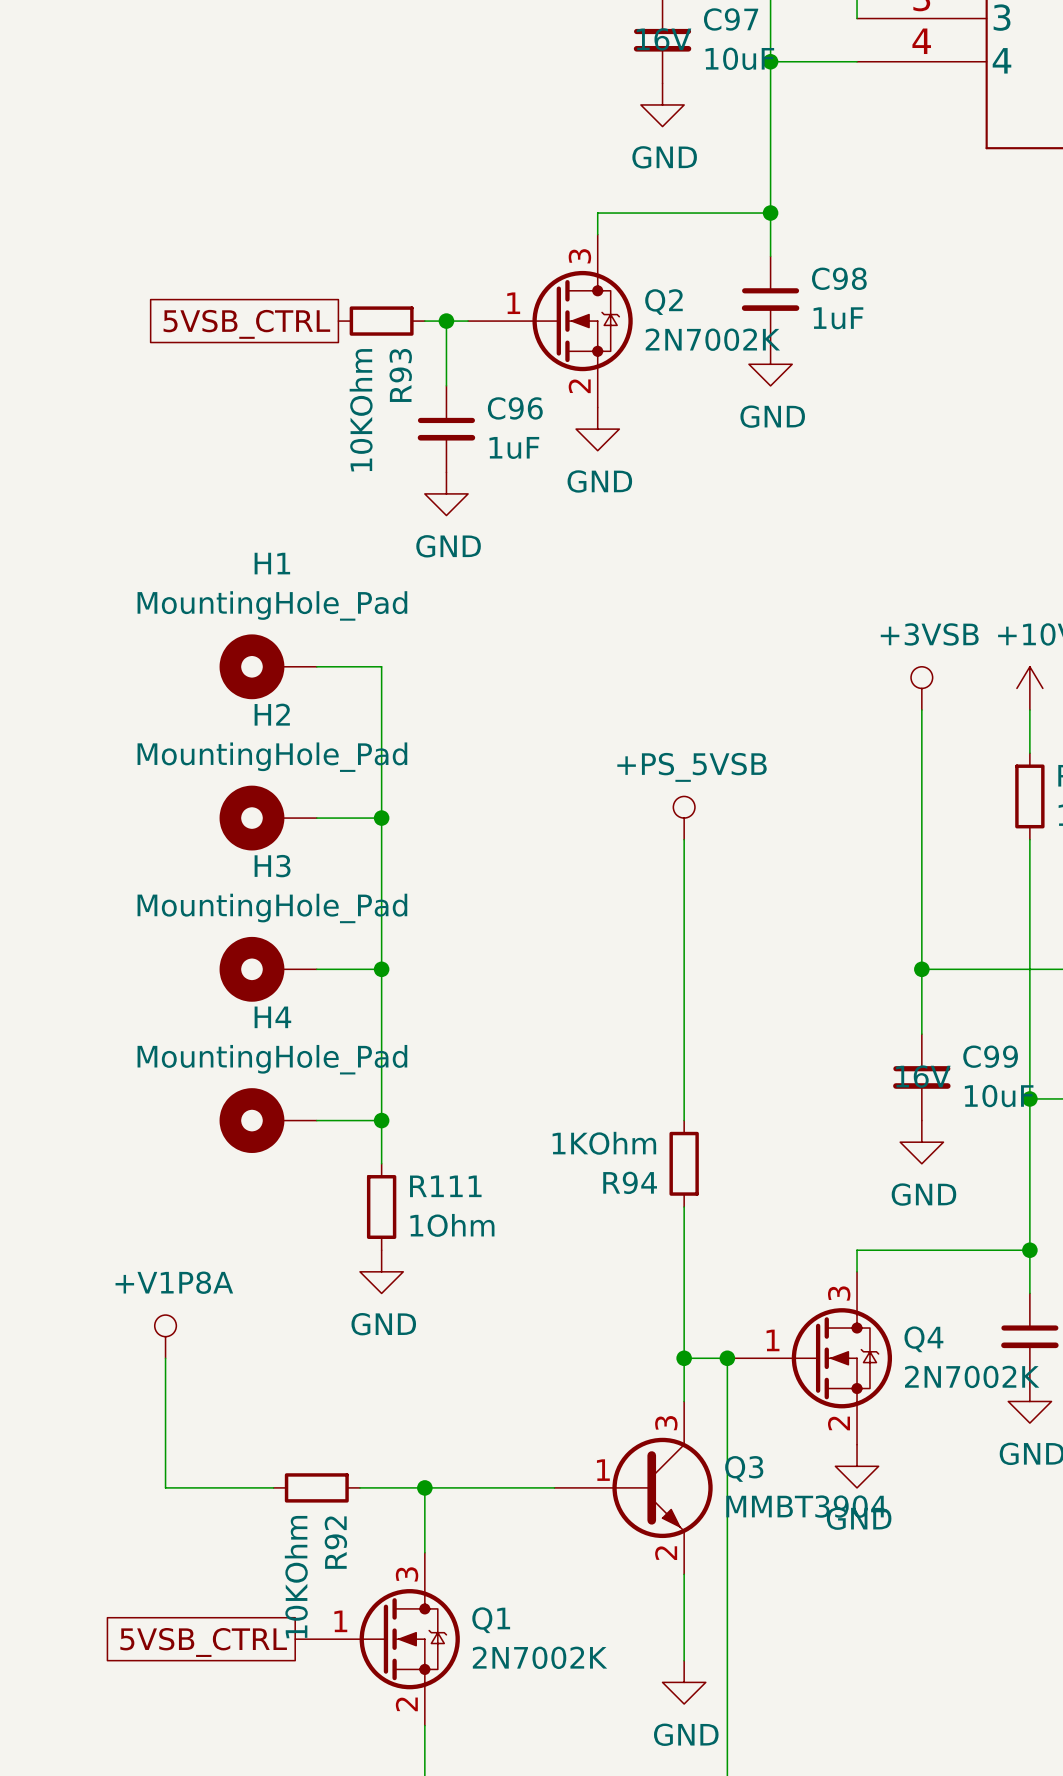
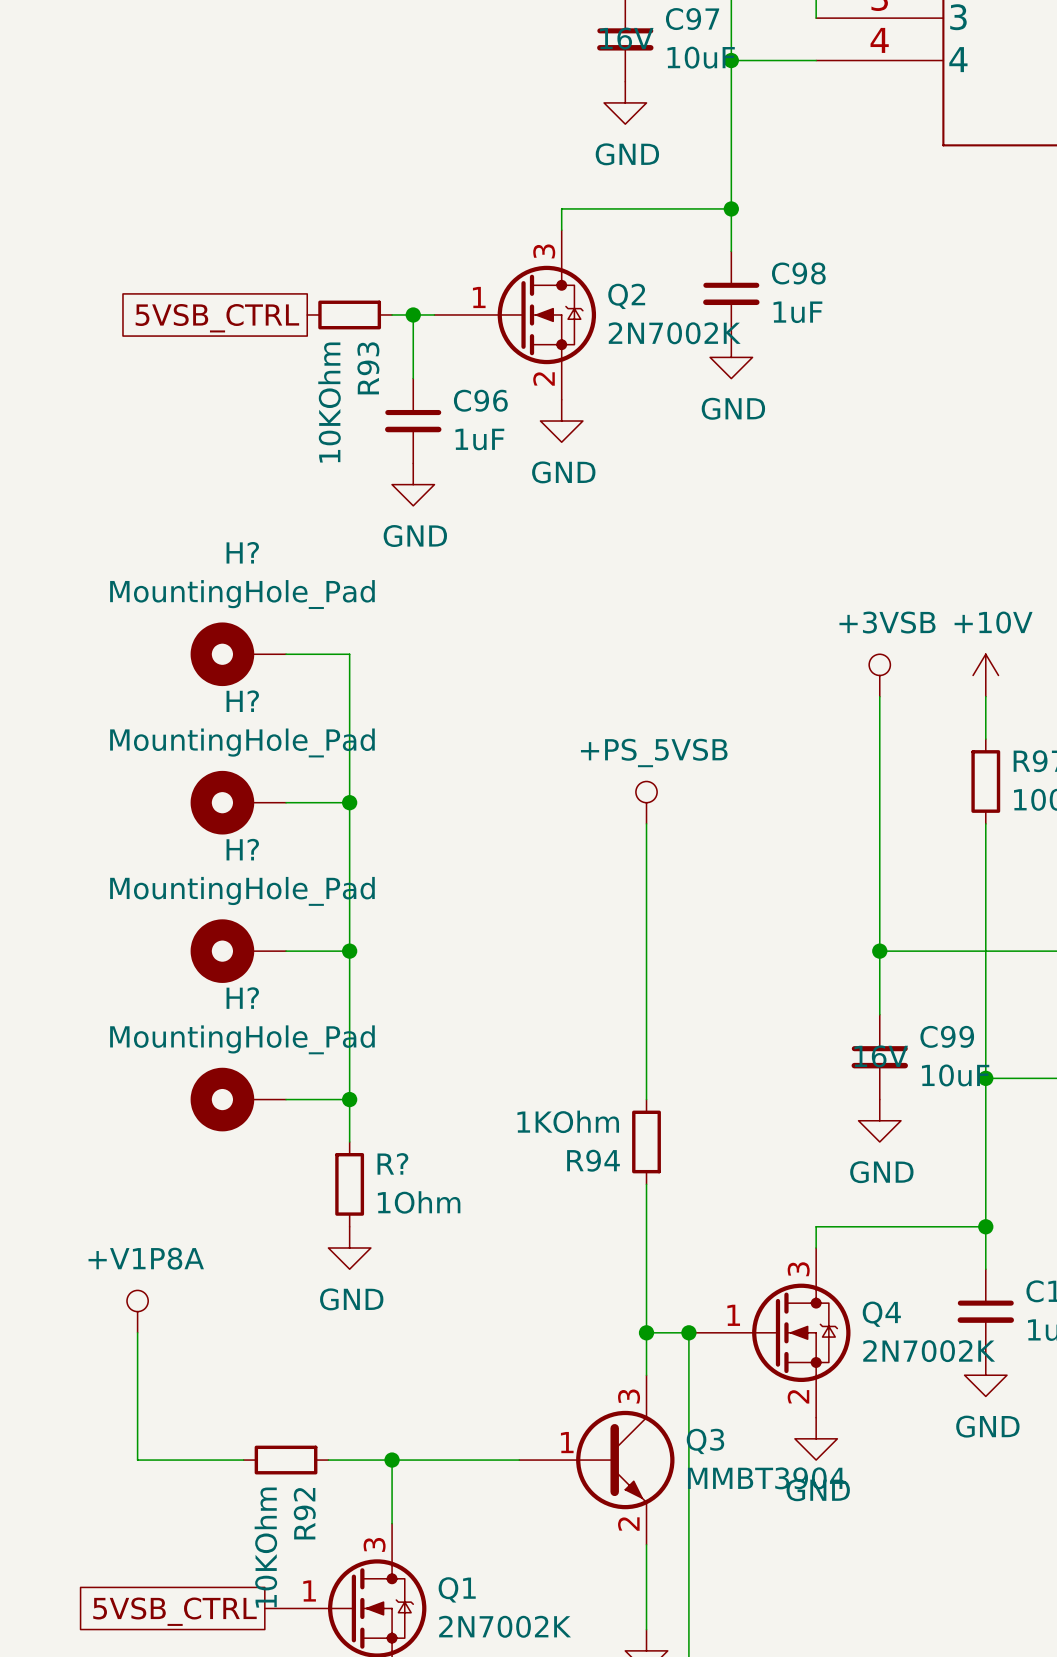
H1 name: H1 (272, 563) -> H? (242, 552)
H2 name: H2 (272, 714) -> H? (242, 701)
H3 name: H3 (272, 866) -> H? (242, 849)
H4 name: H4 (272, 1017) -> H? (242, 998)
R111 name: R111 (445, 1186) -> R? (392, 1163)

